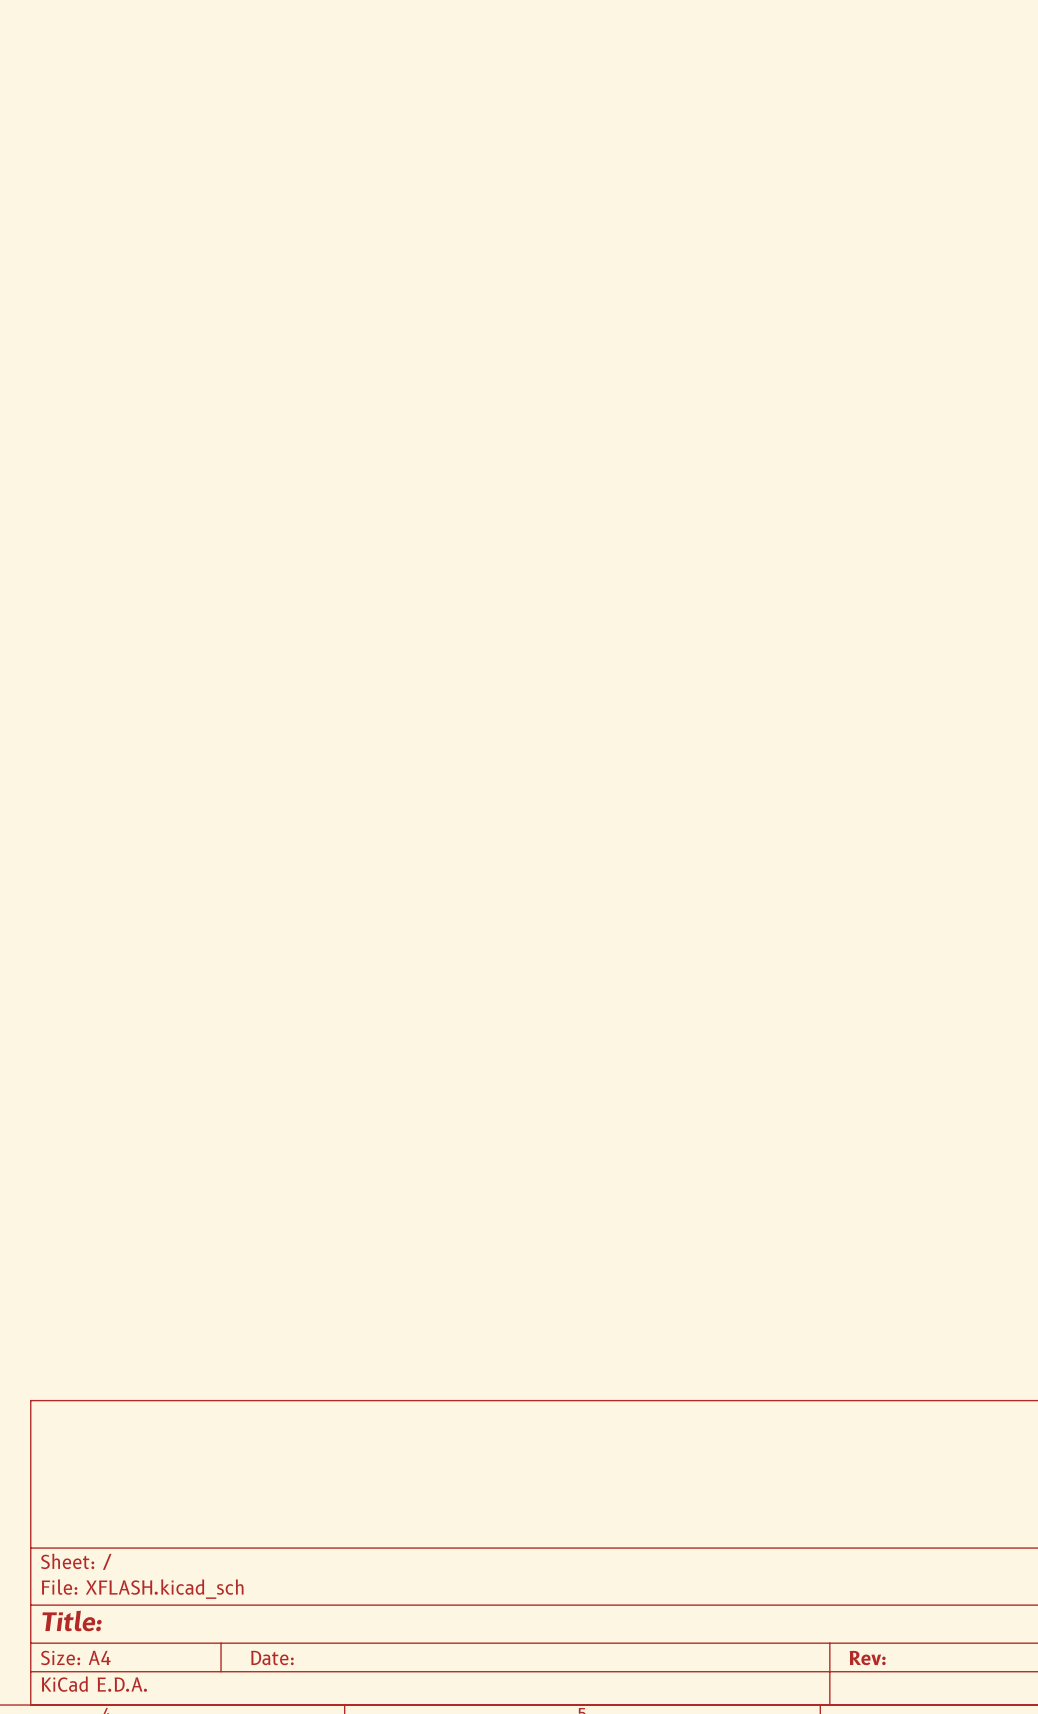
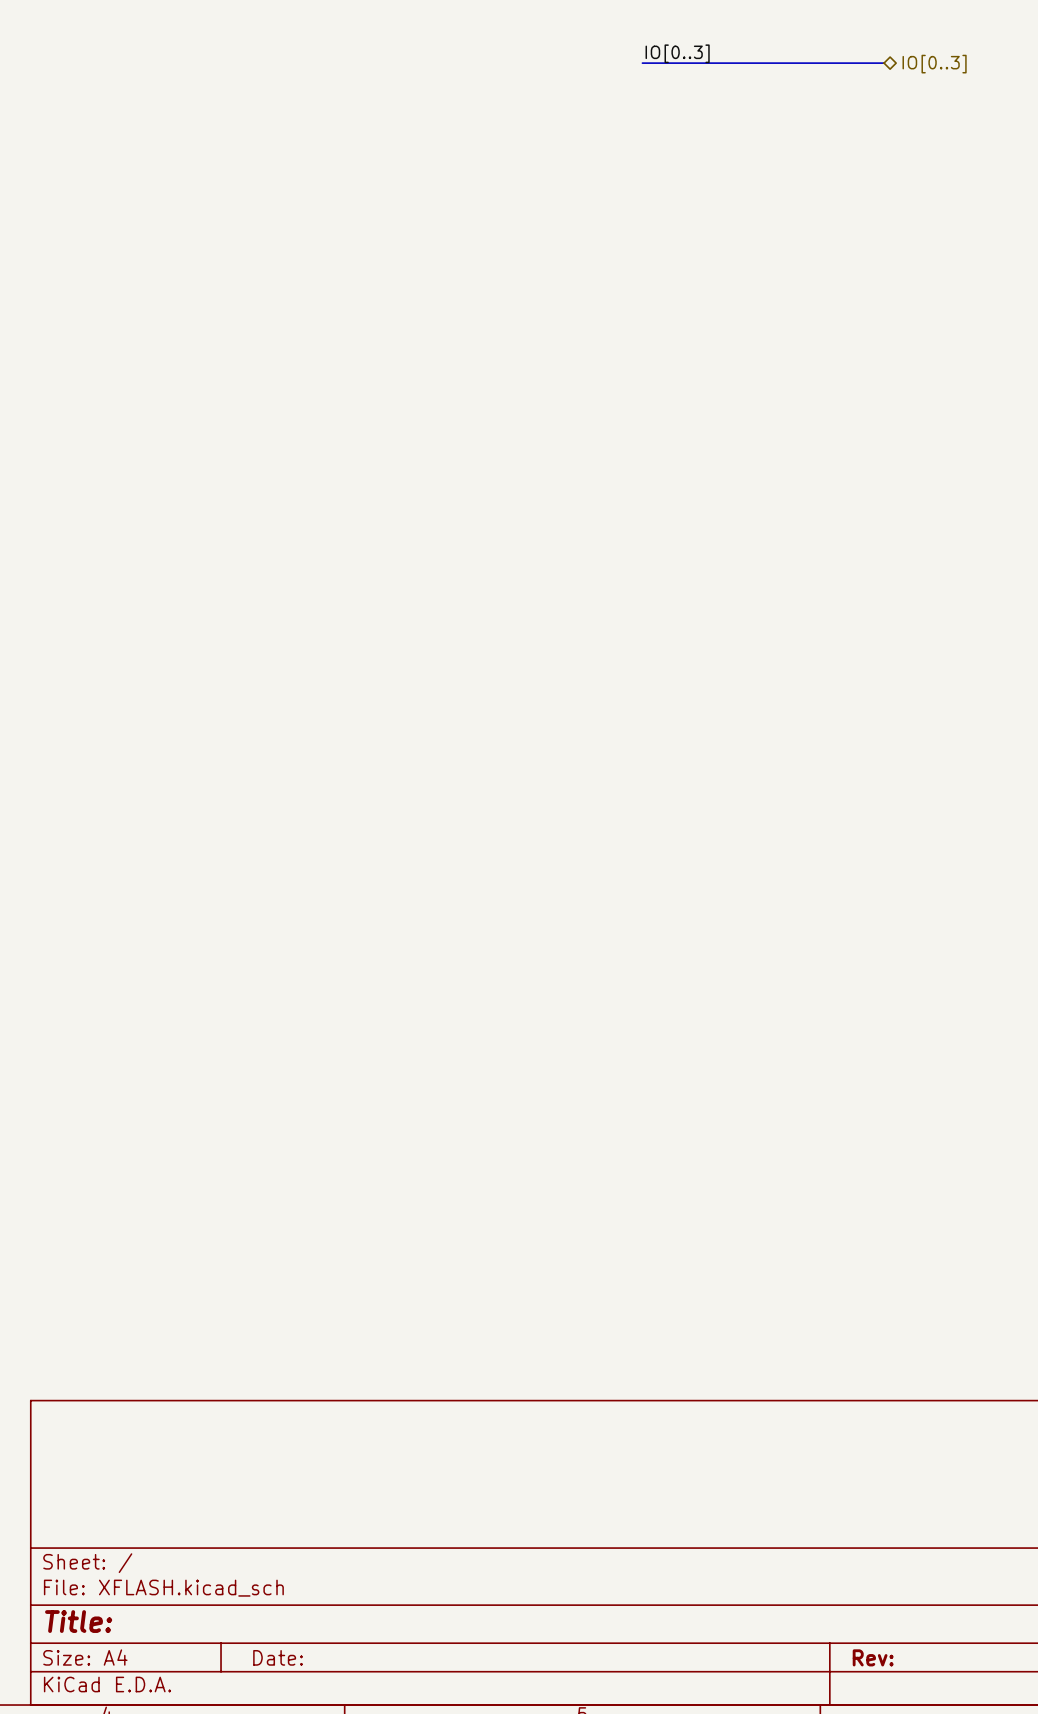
label: none -> IO[0..3] (677, 53)
bus: none -> (642, 63) (884, 63)
hierarchical label: none -> IO[0..3] (934, 64)

